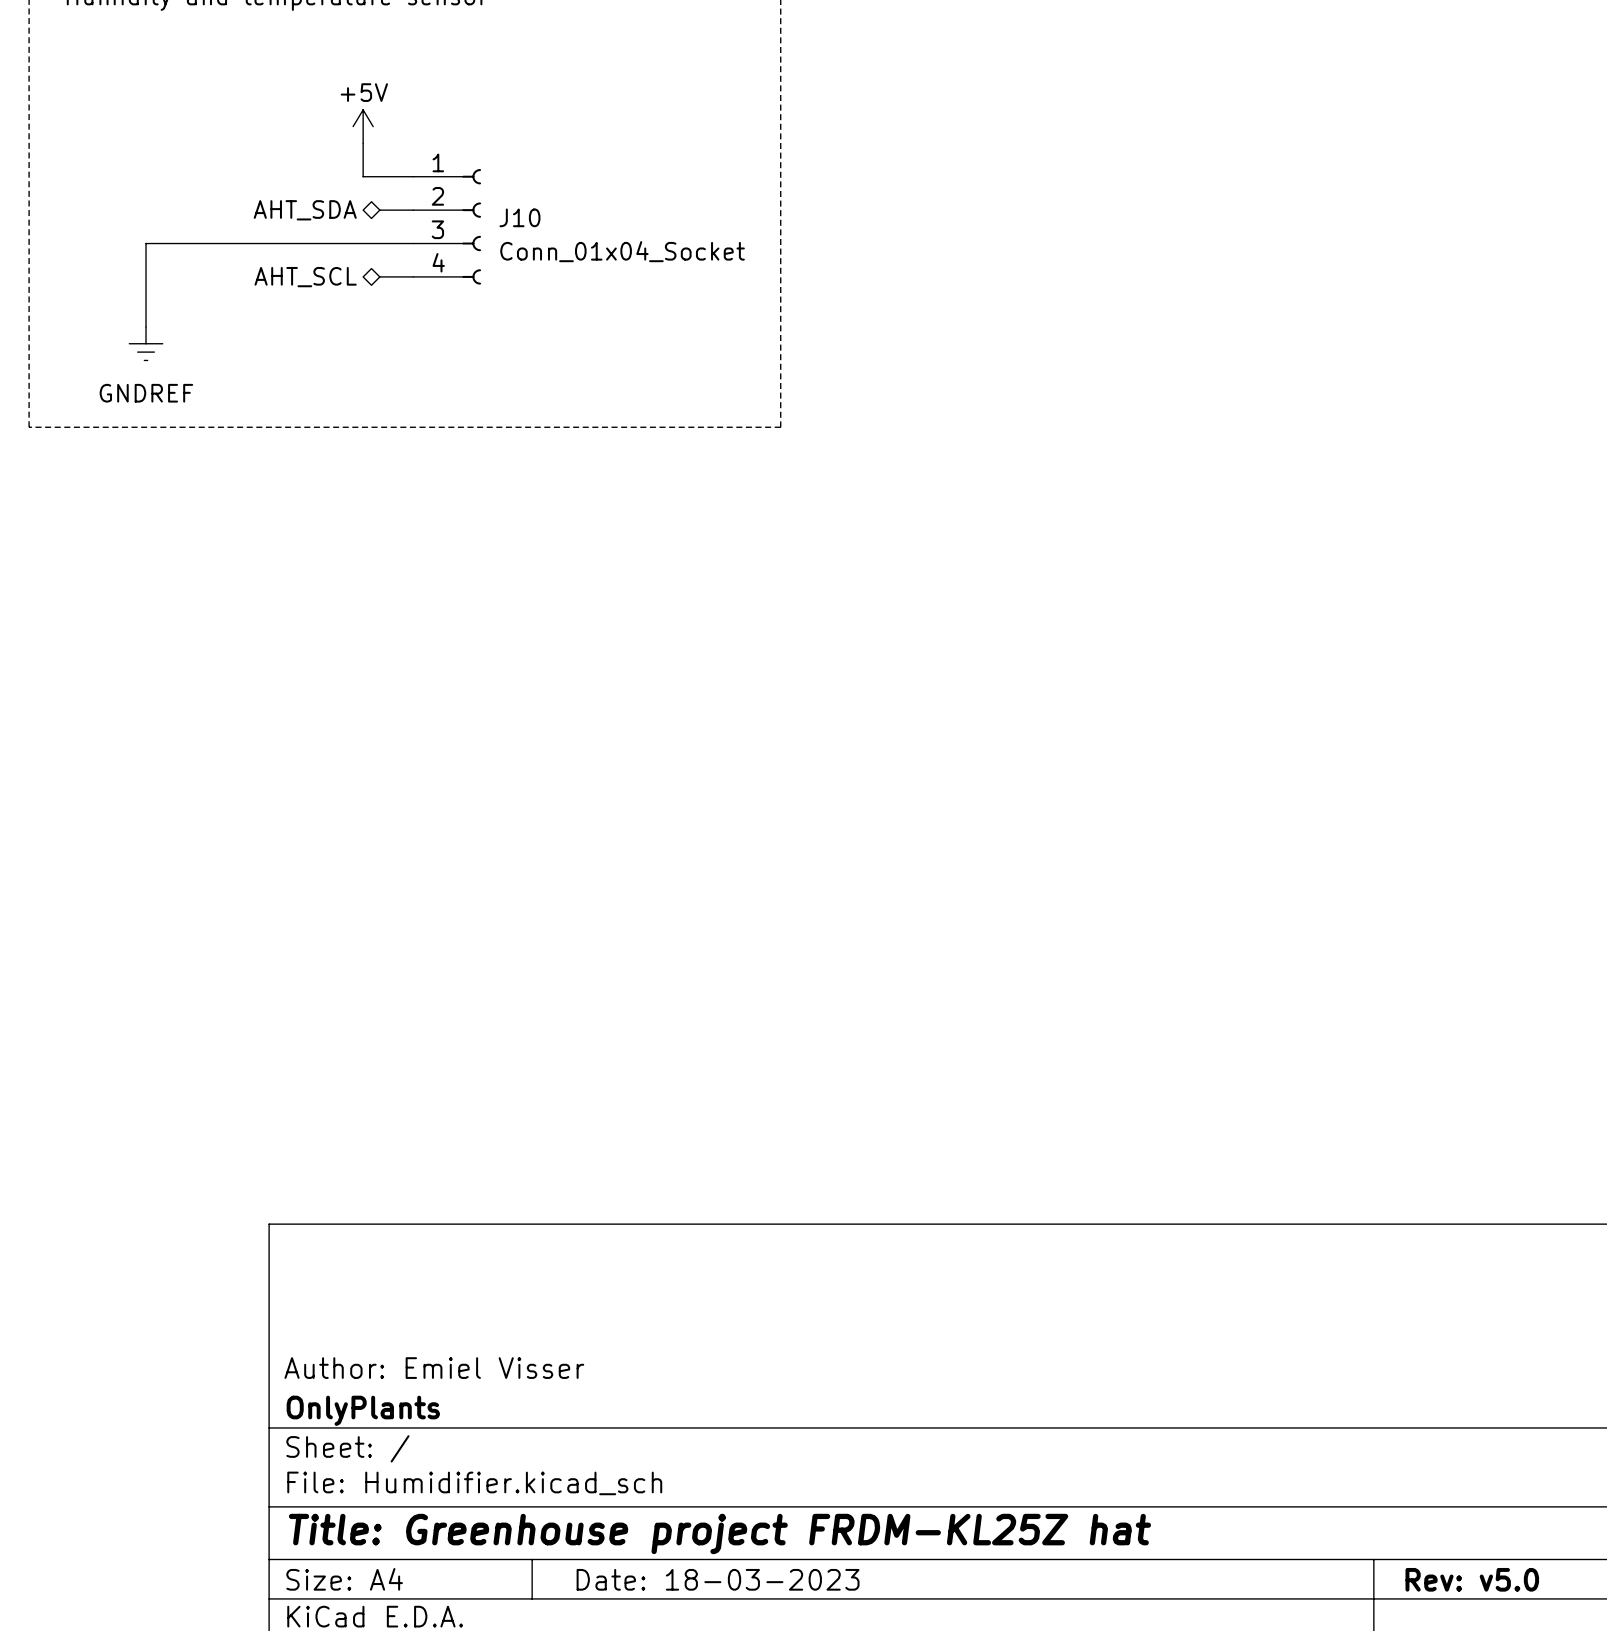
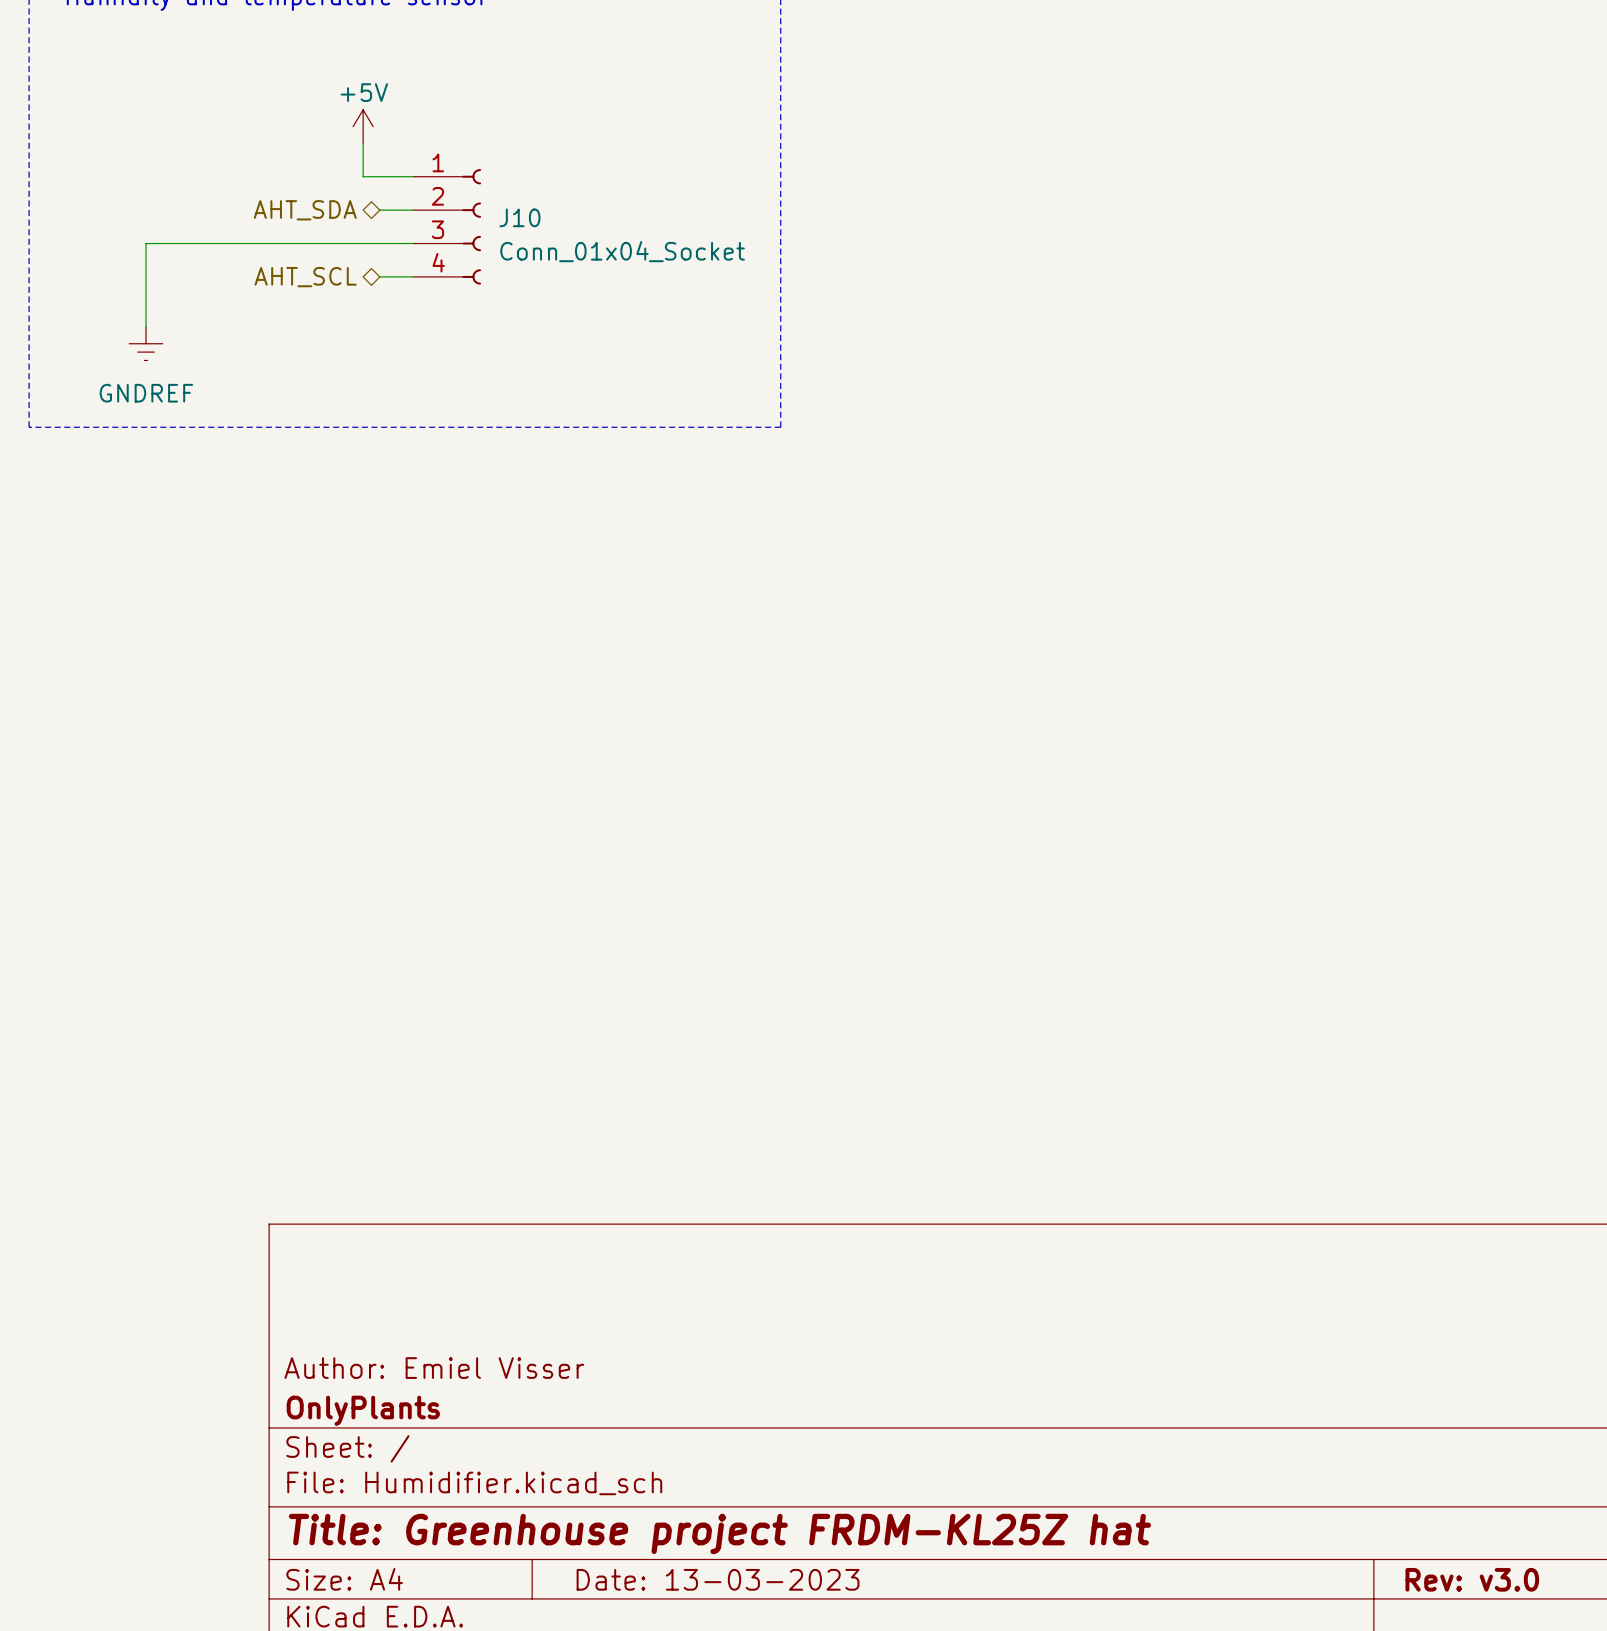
title block: Date: 18-03-2023 (718, 1579) -> Date: 13-03-2023 (718, 1579)
title block: Rev: v5.0 (1472, 1579) -> Rev: v3.0 (1472, 1579)

